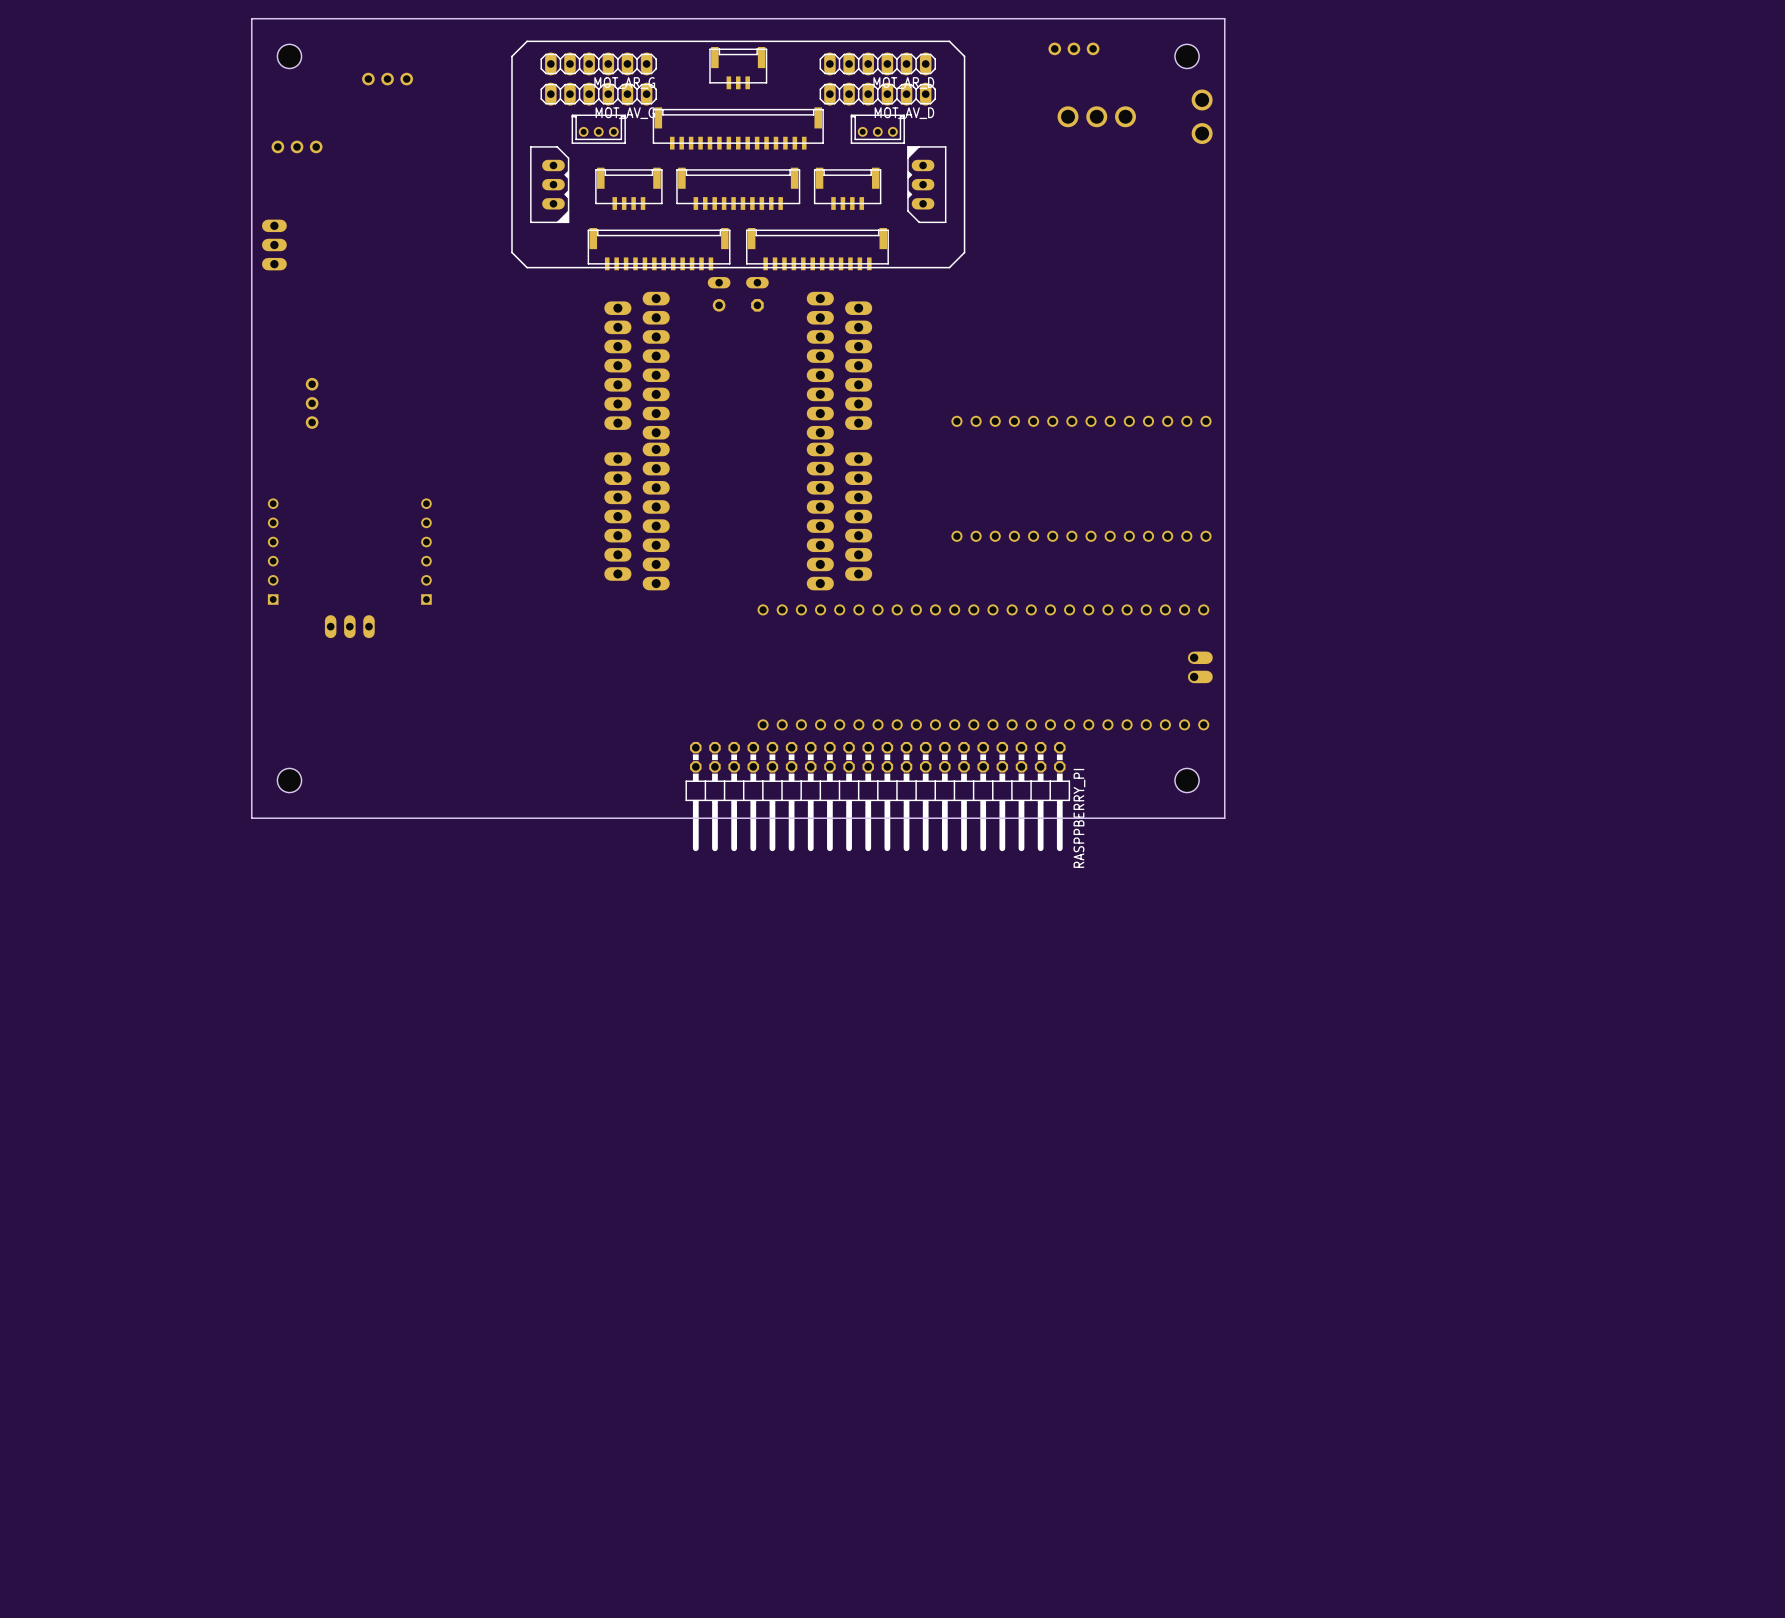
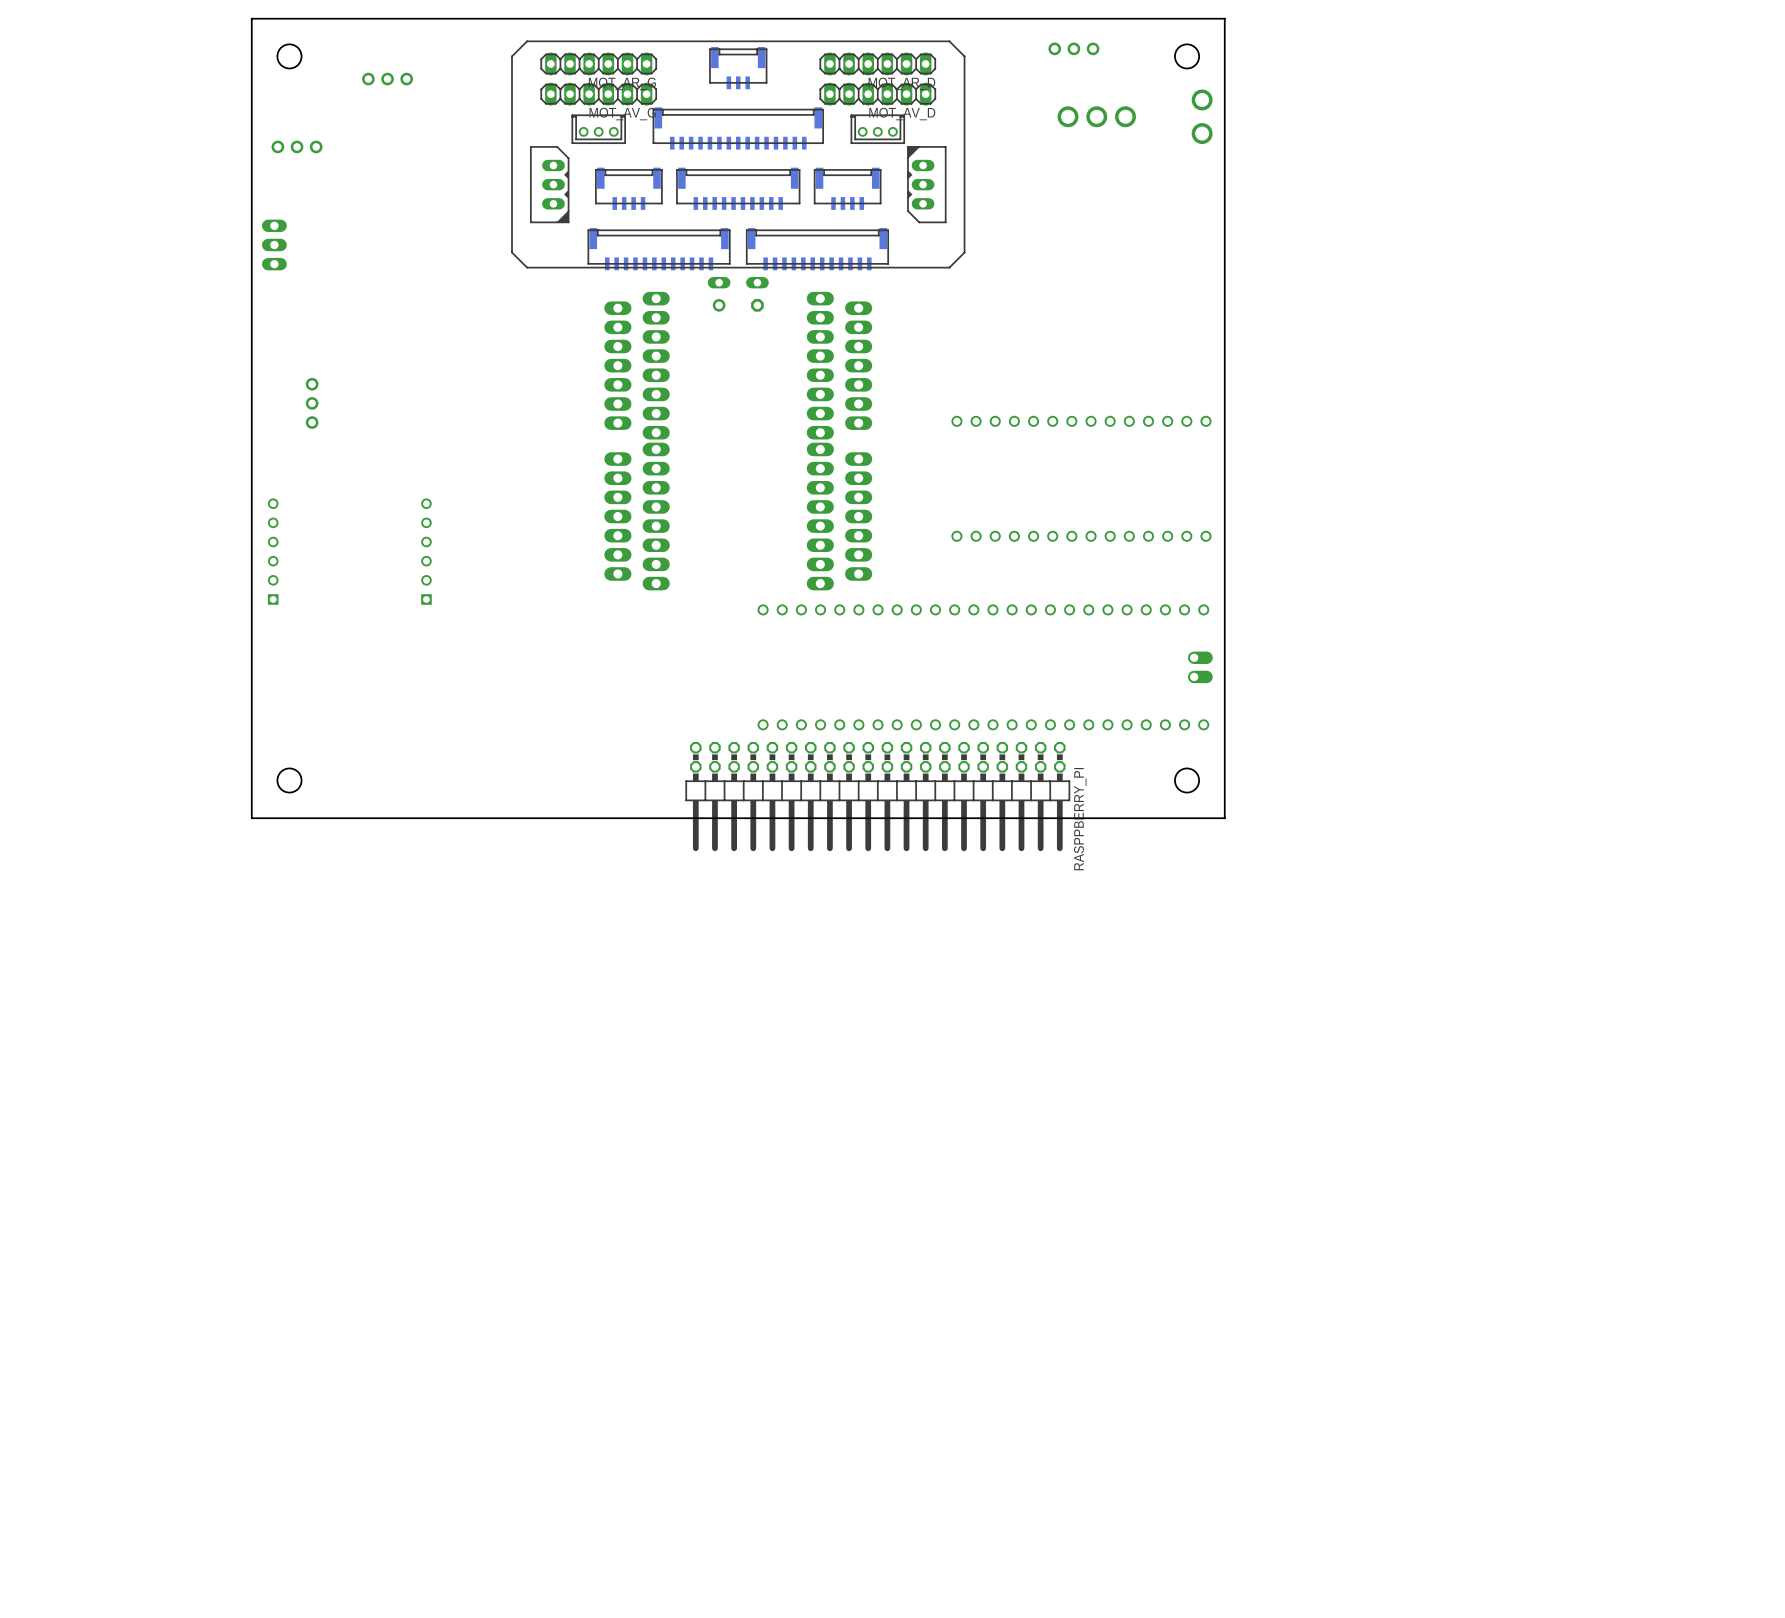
part: (349, 626) -> none

